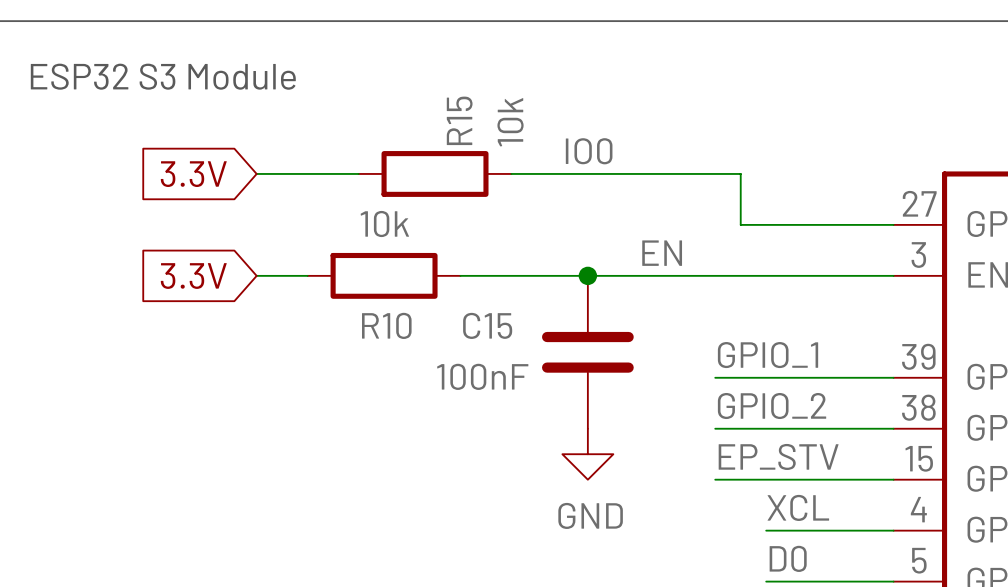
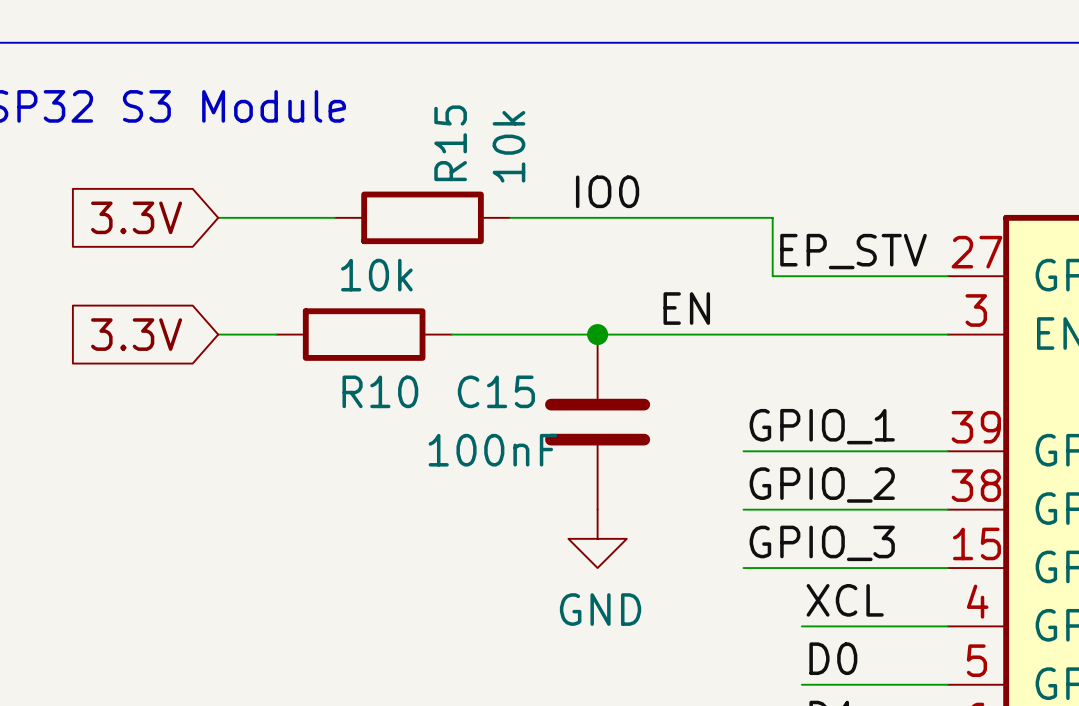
label: none -> EP_STV (853, 251)
label: EP_STV (778, 456) -> GPIO_3 (822, 543)

